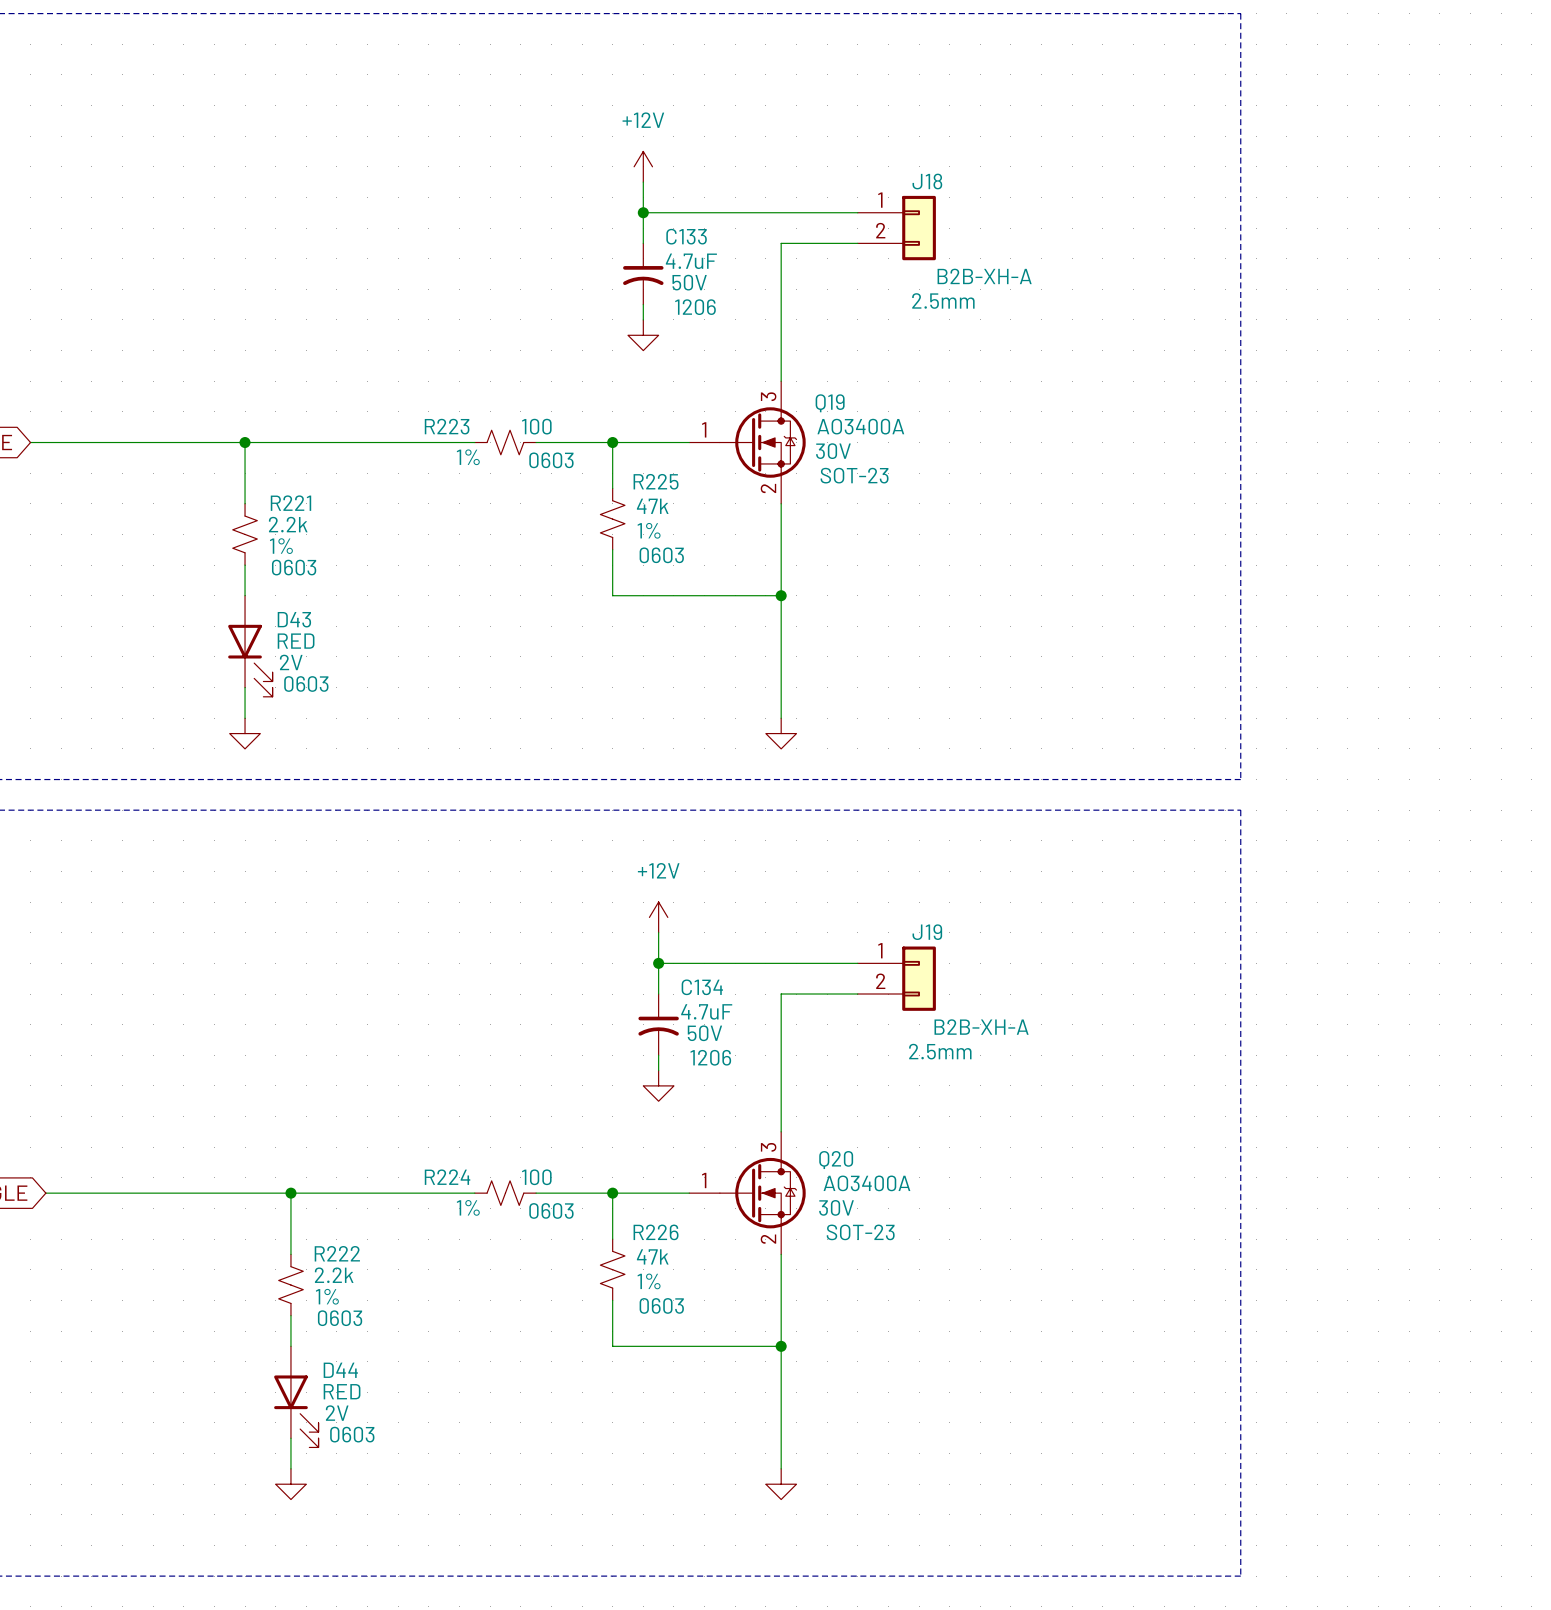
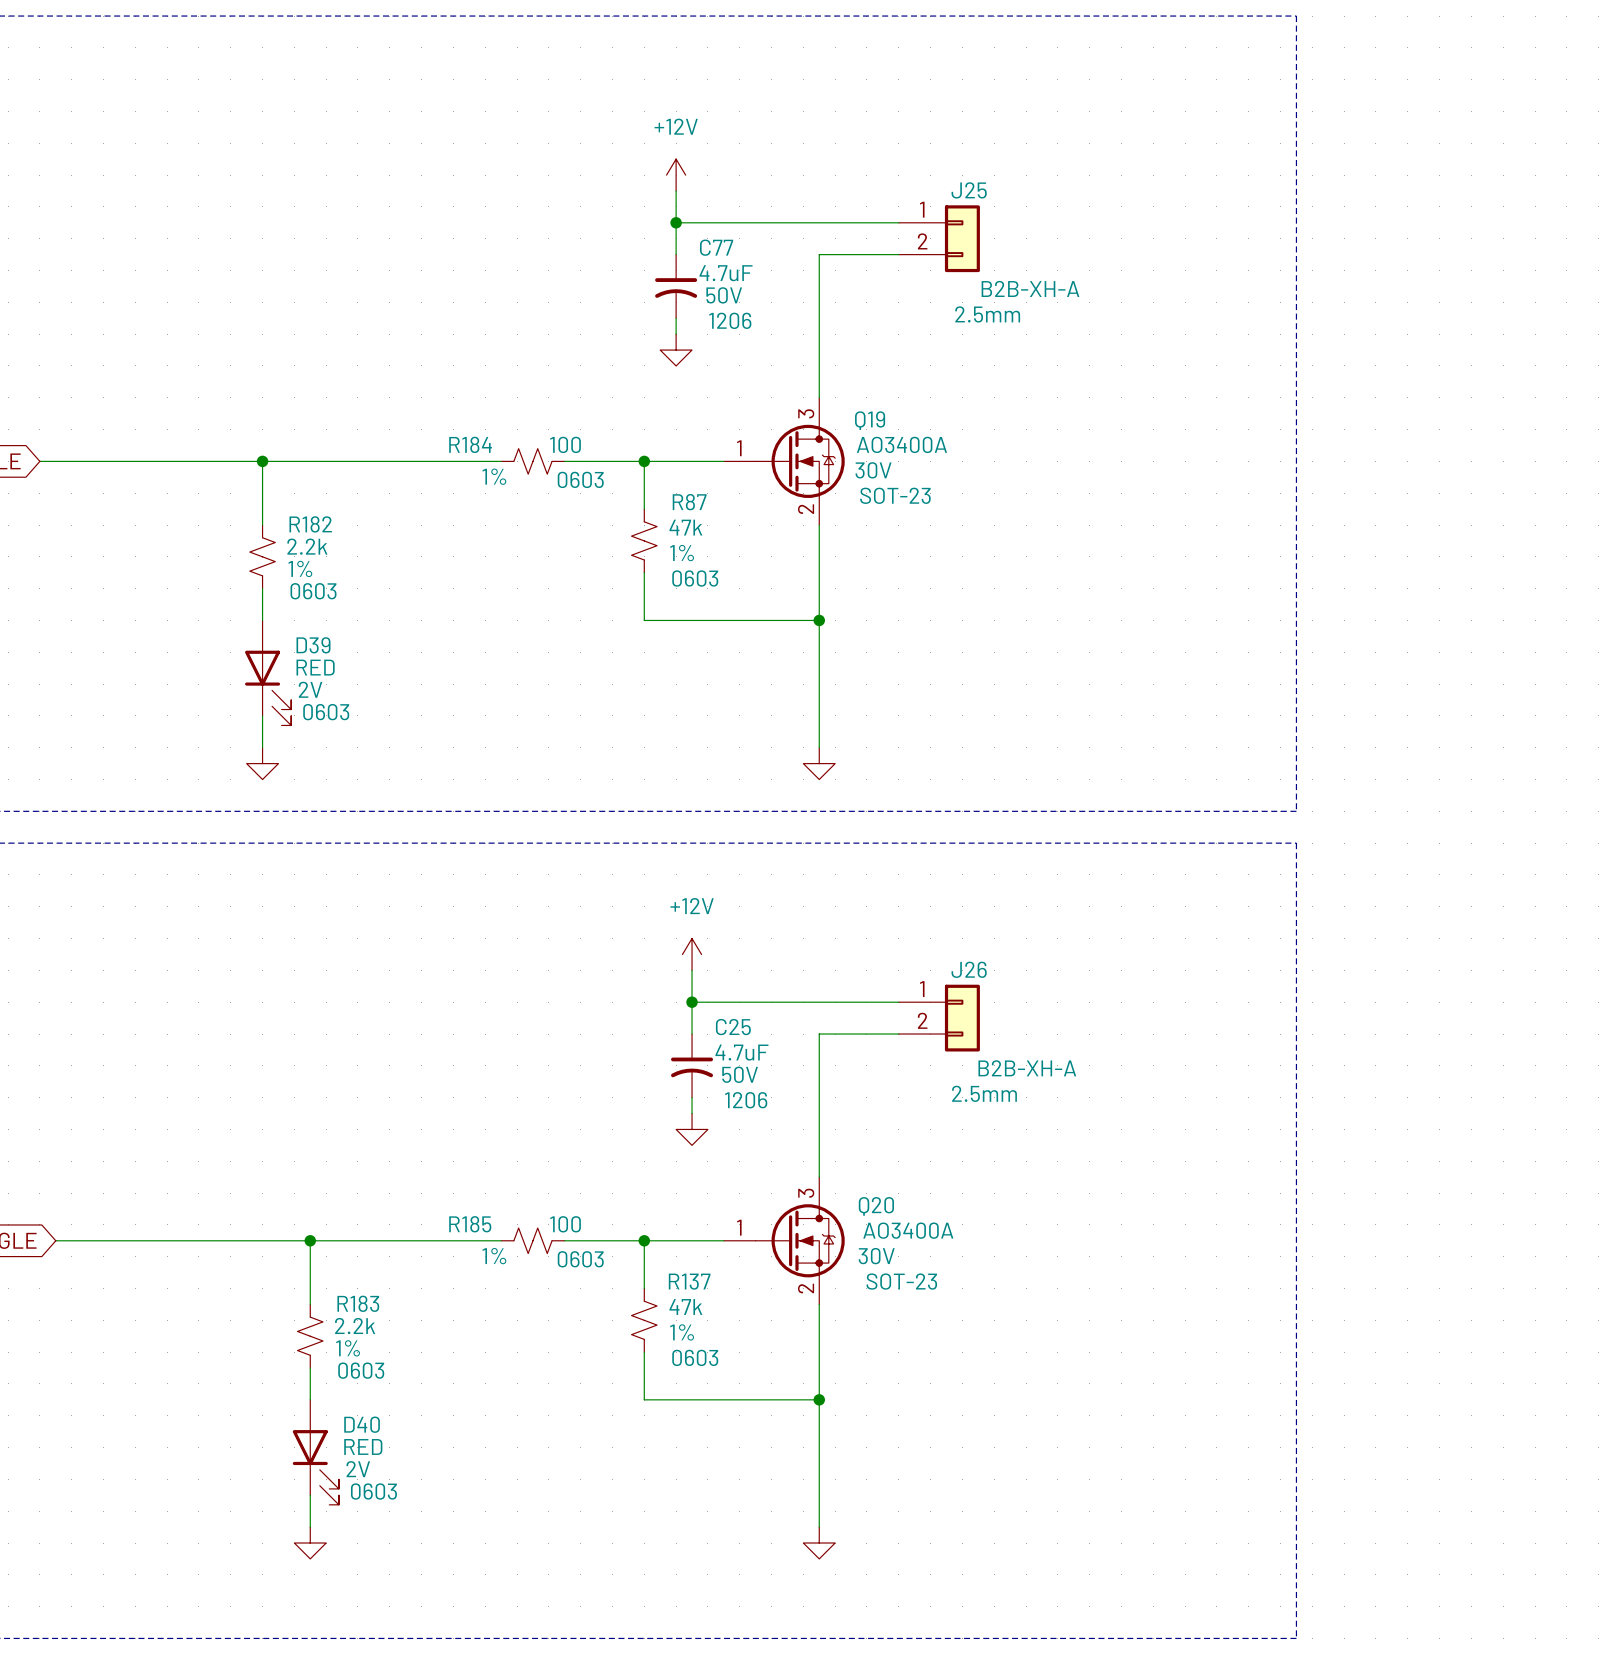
J18 name: J18 (927, 181) -> J25 (969, 190)
C133 name: C133 (686, 236) -> C77 (716, 247)
R223 name: R223 (447, 426) -> R184 (470, 444)
R225 name: R225 (656, 481) -> R87 (689, 502)
R221 name: R221 (290, 503) -> R182 (310, 524)
D43 name: D43 (294, 619) -> D39 (313, 645)
J19 name: J19 (927, 932) -> J26 (969, 969)
C134 name: C134 (702, 987) -> C25 (733, 1027)
R224 name: R224 (447, 1177) -> R185 (470, 1224)
R226 name: R226 (656, 1232) -> R137 (689, 1281)
R222 name: R222 (337, 1253) -> R183 (358, 1303)
D44 name: D44 (340, 1370) -> D40 (362, 1424)

